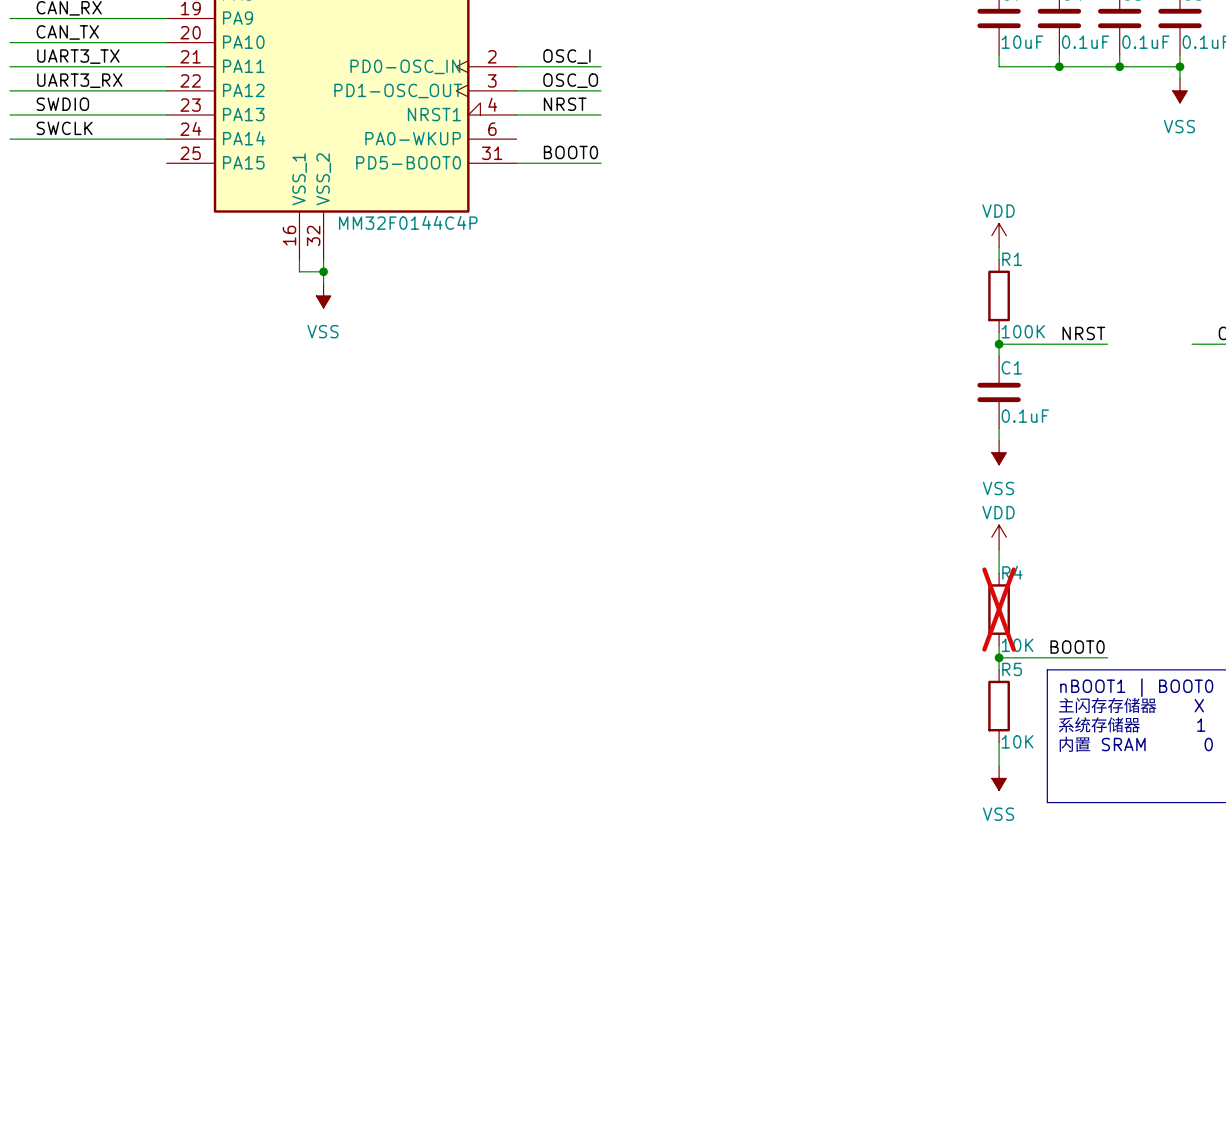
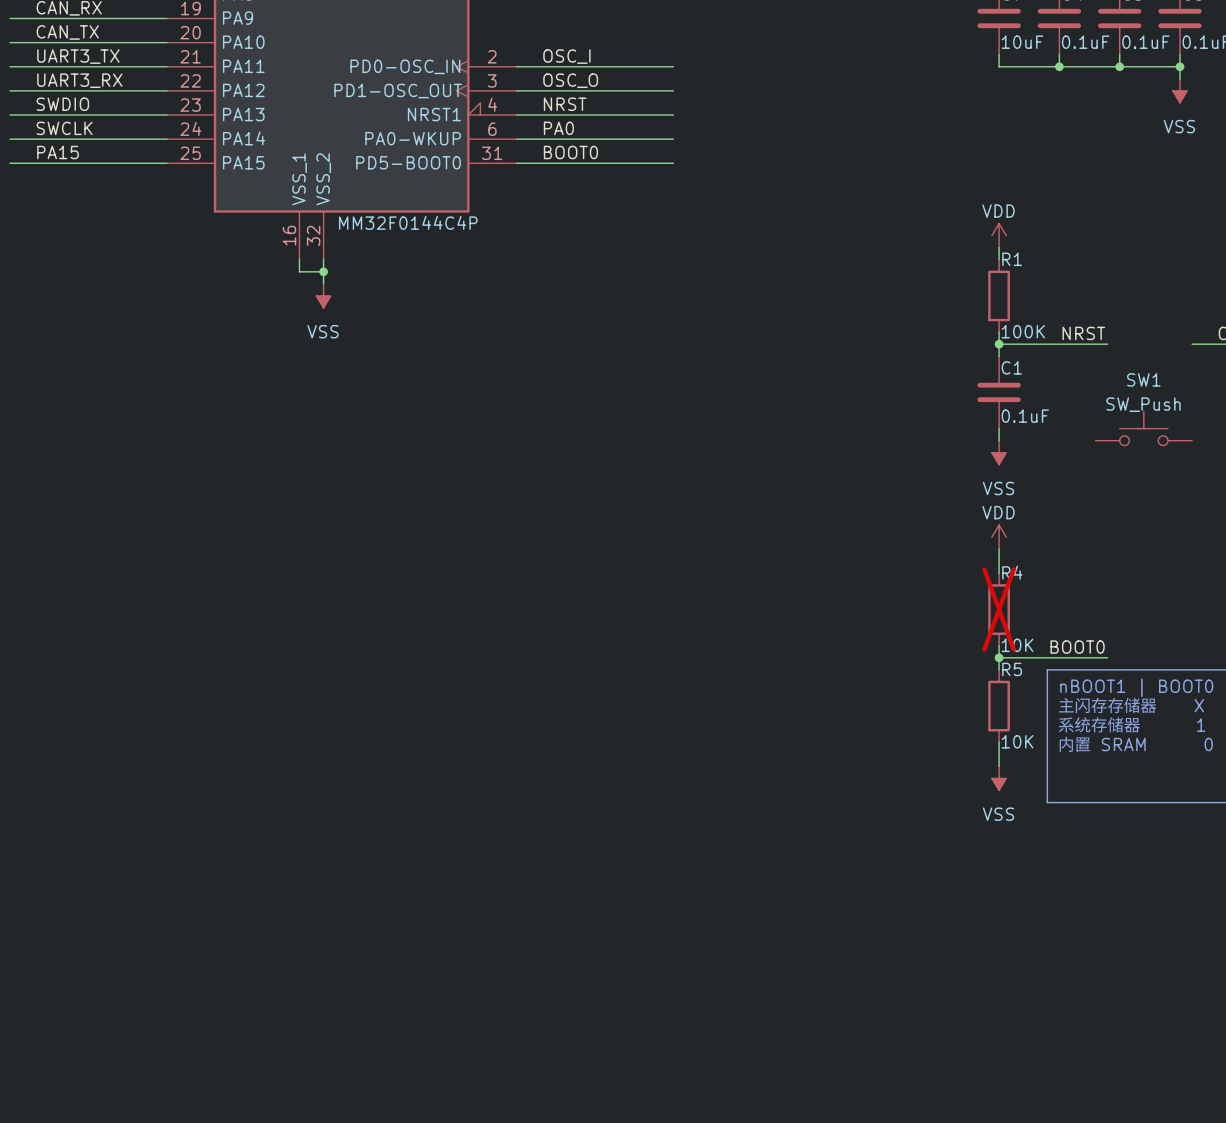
wire: none -> (601, 66) (673, 66)
wire: none -> (601, 90) (673, 90)
wire: none -> (601, 115) (673, 115)
label: none -> PA0 (558, 128)
wire: none -> (516, 139) (673, 139)
label: none -> PA15 (58, 152)
wire: none -> (9, 163) (166, 163)
wire: none -> (601, 163) (673, 163)
SW1: none -> SW_Push (1143, 428)

